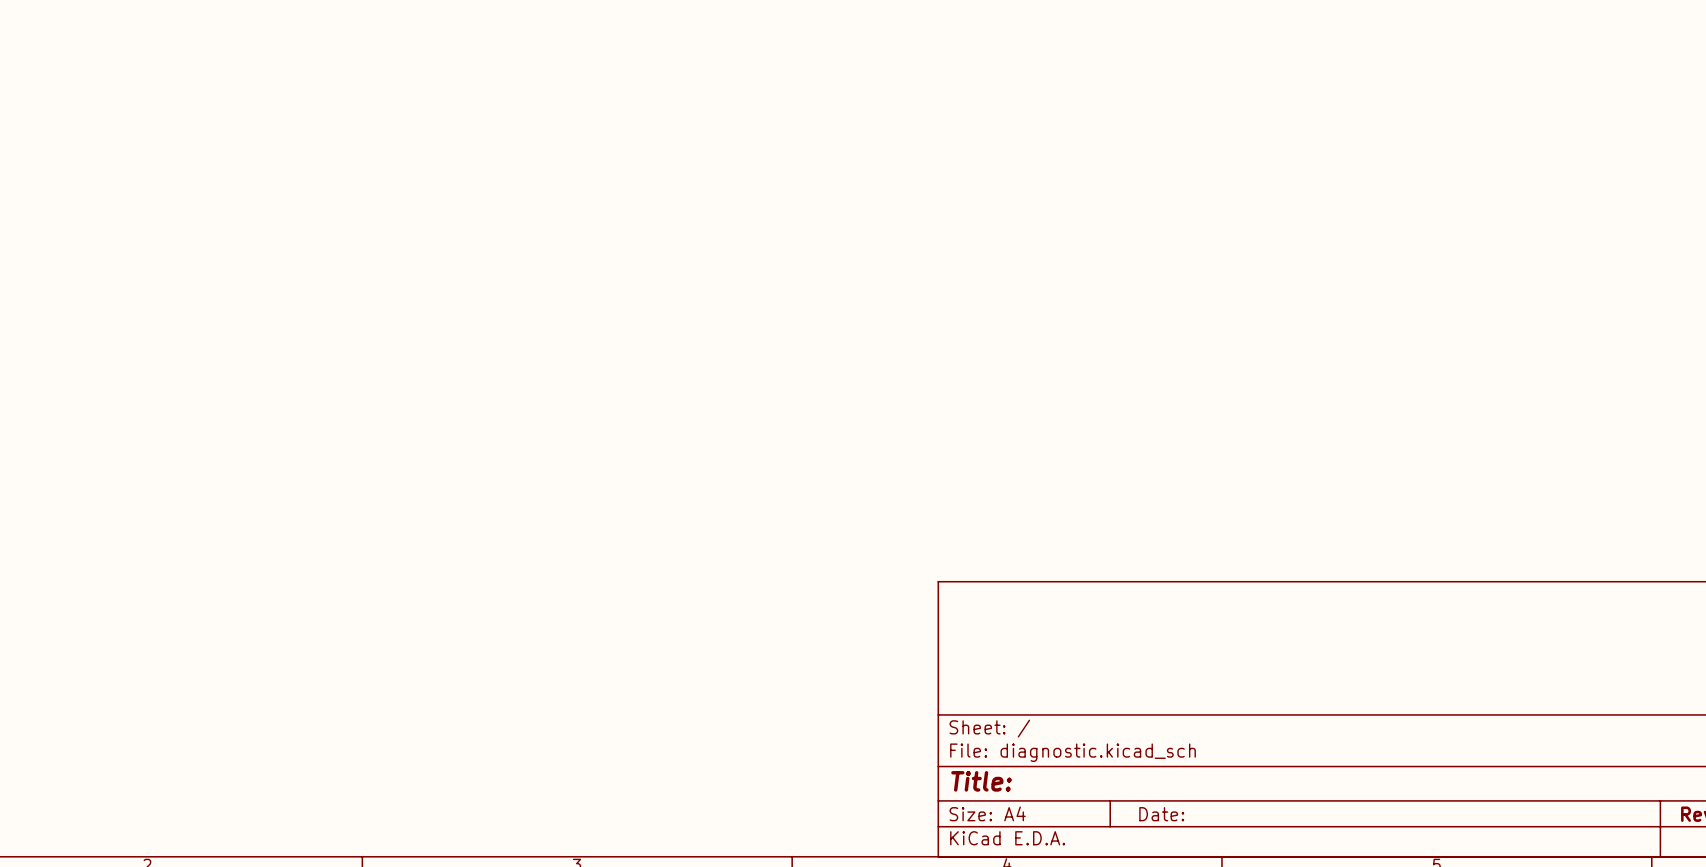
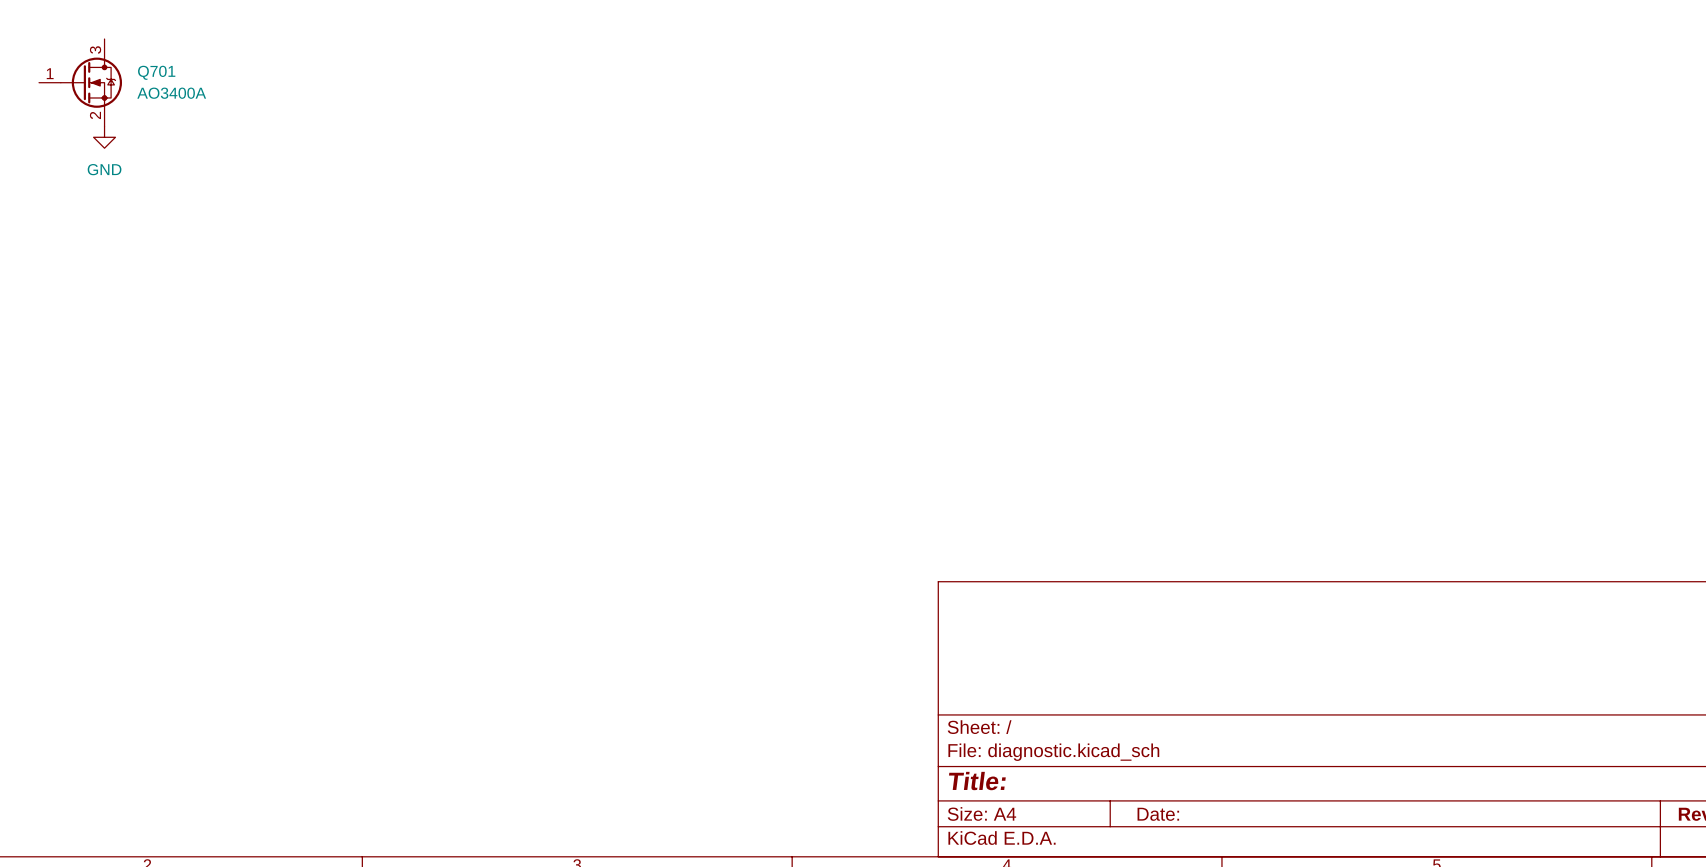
Q701: none -> AO3400A (80, 82)
power symbol: none -> GND (104, 137)

